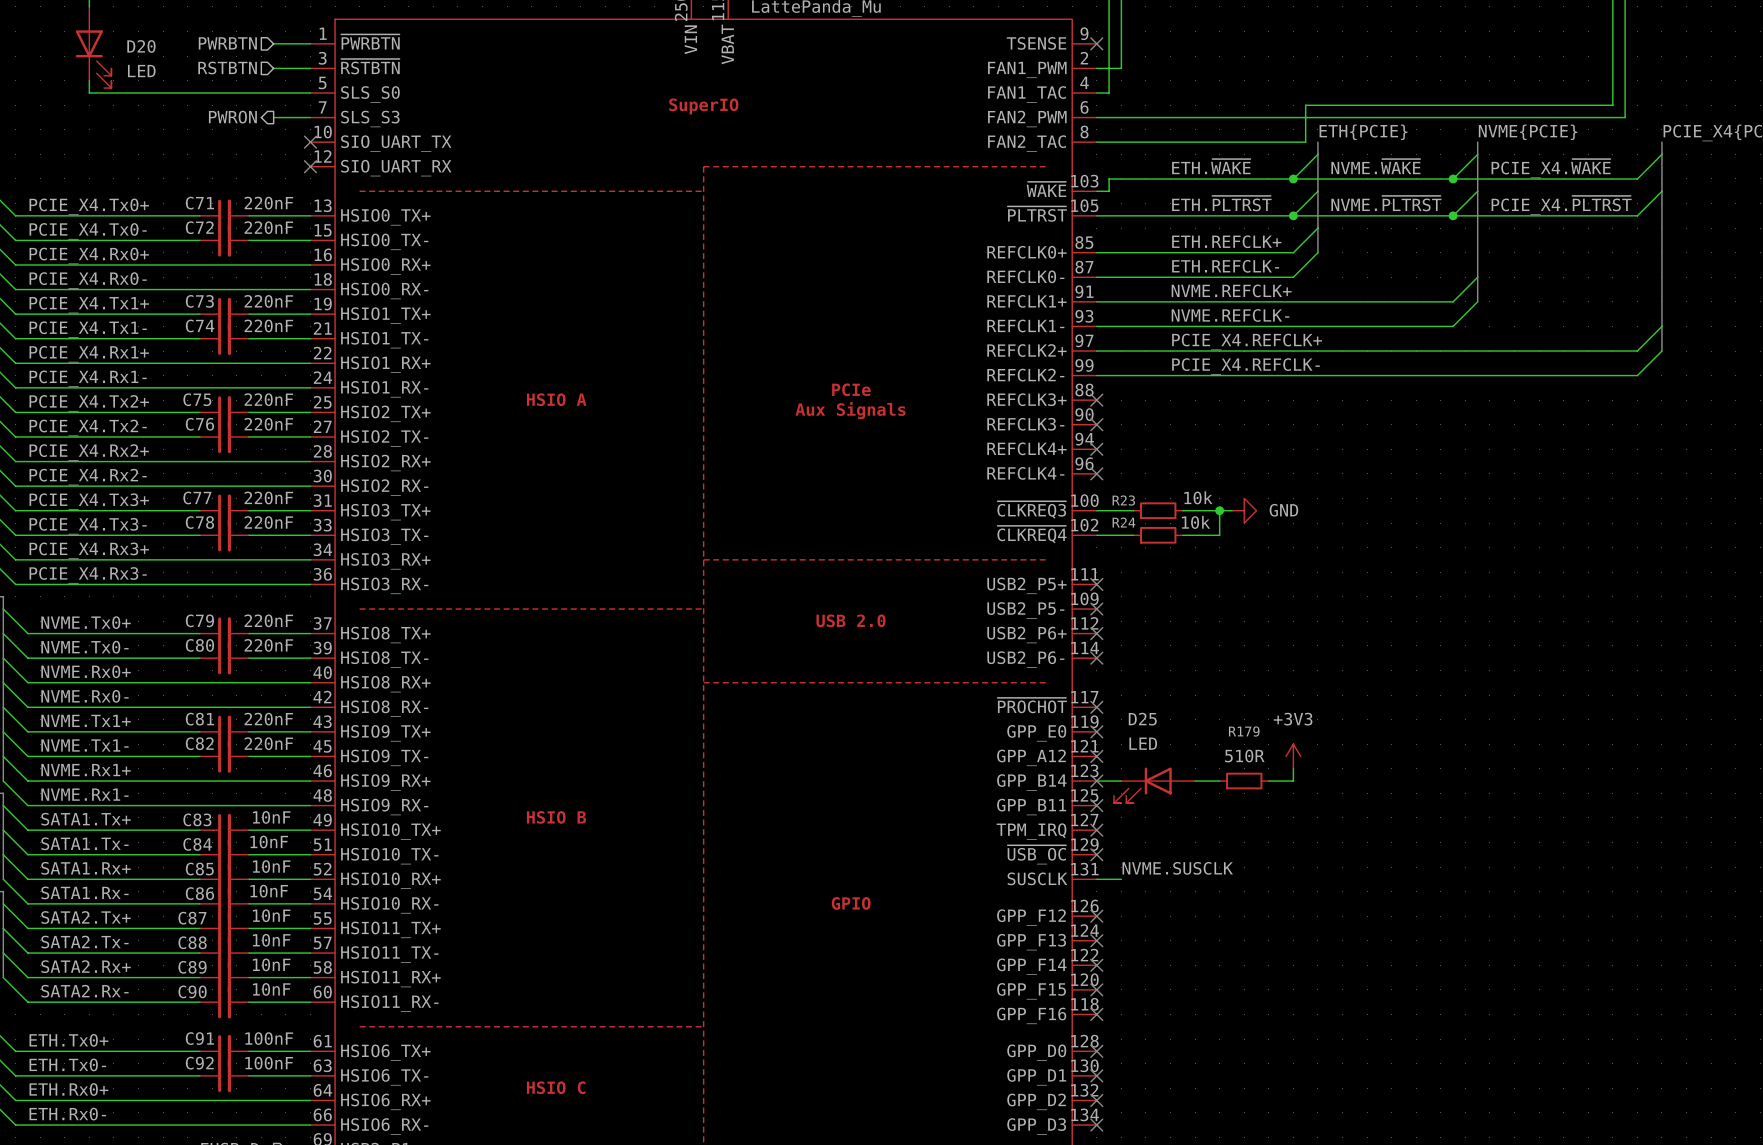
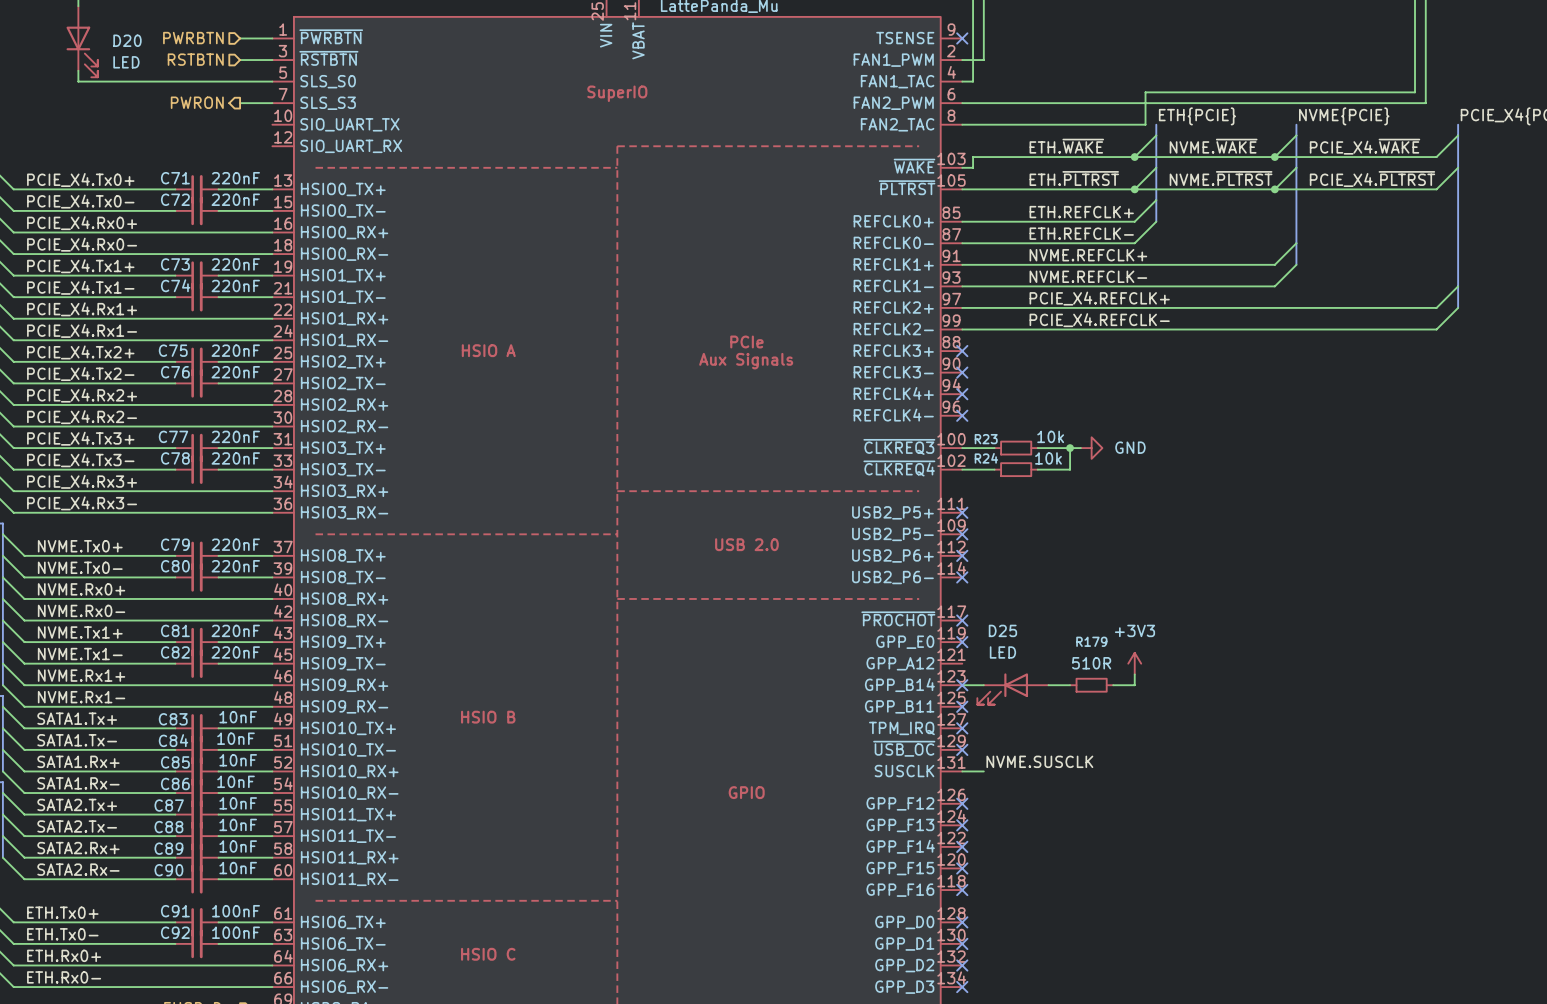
no-connect mark: (310, 142) -> none
no-connect mark: (310, 166) -> none
no-connect mark: (1096, 756) -> none

